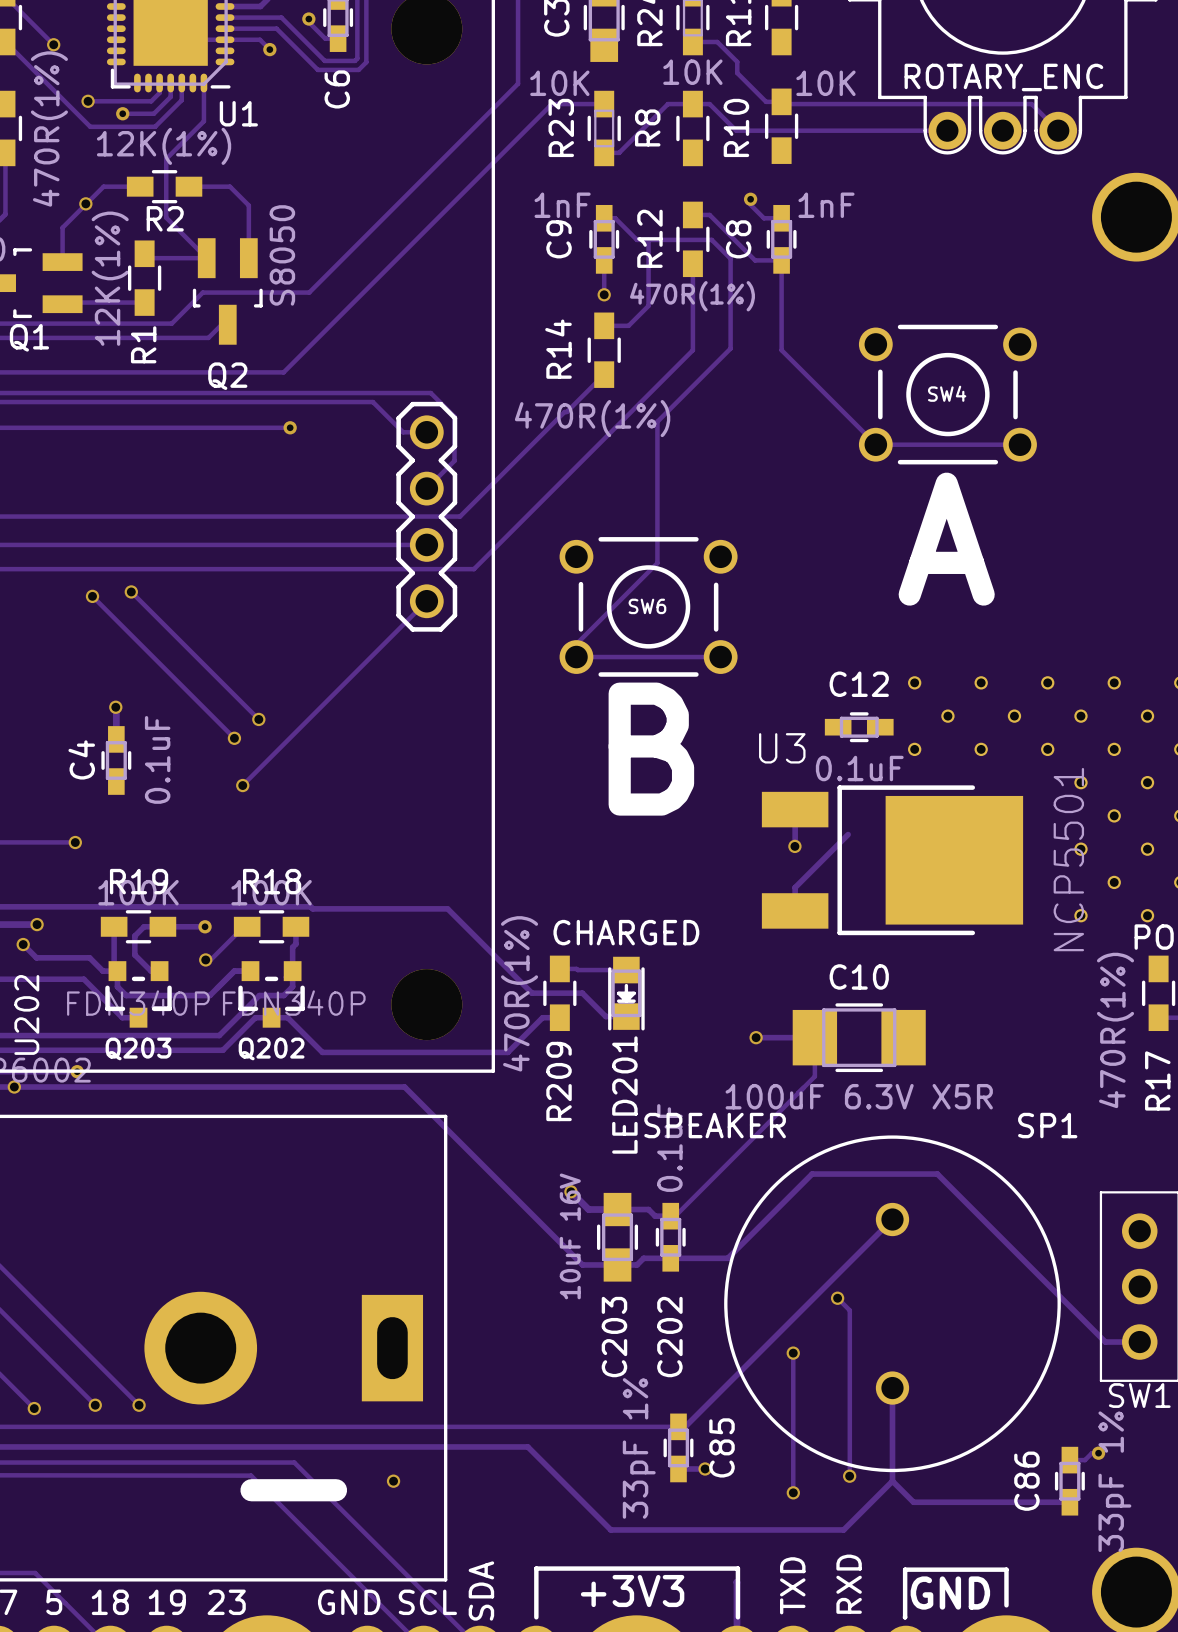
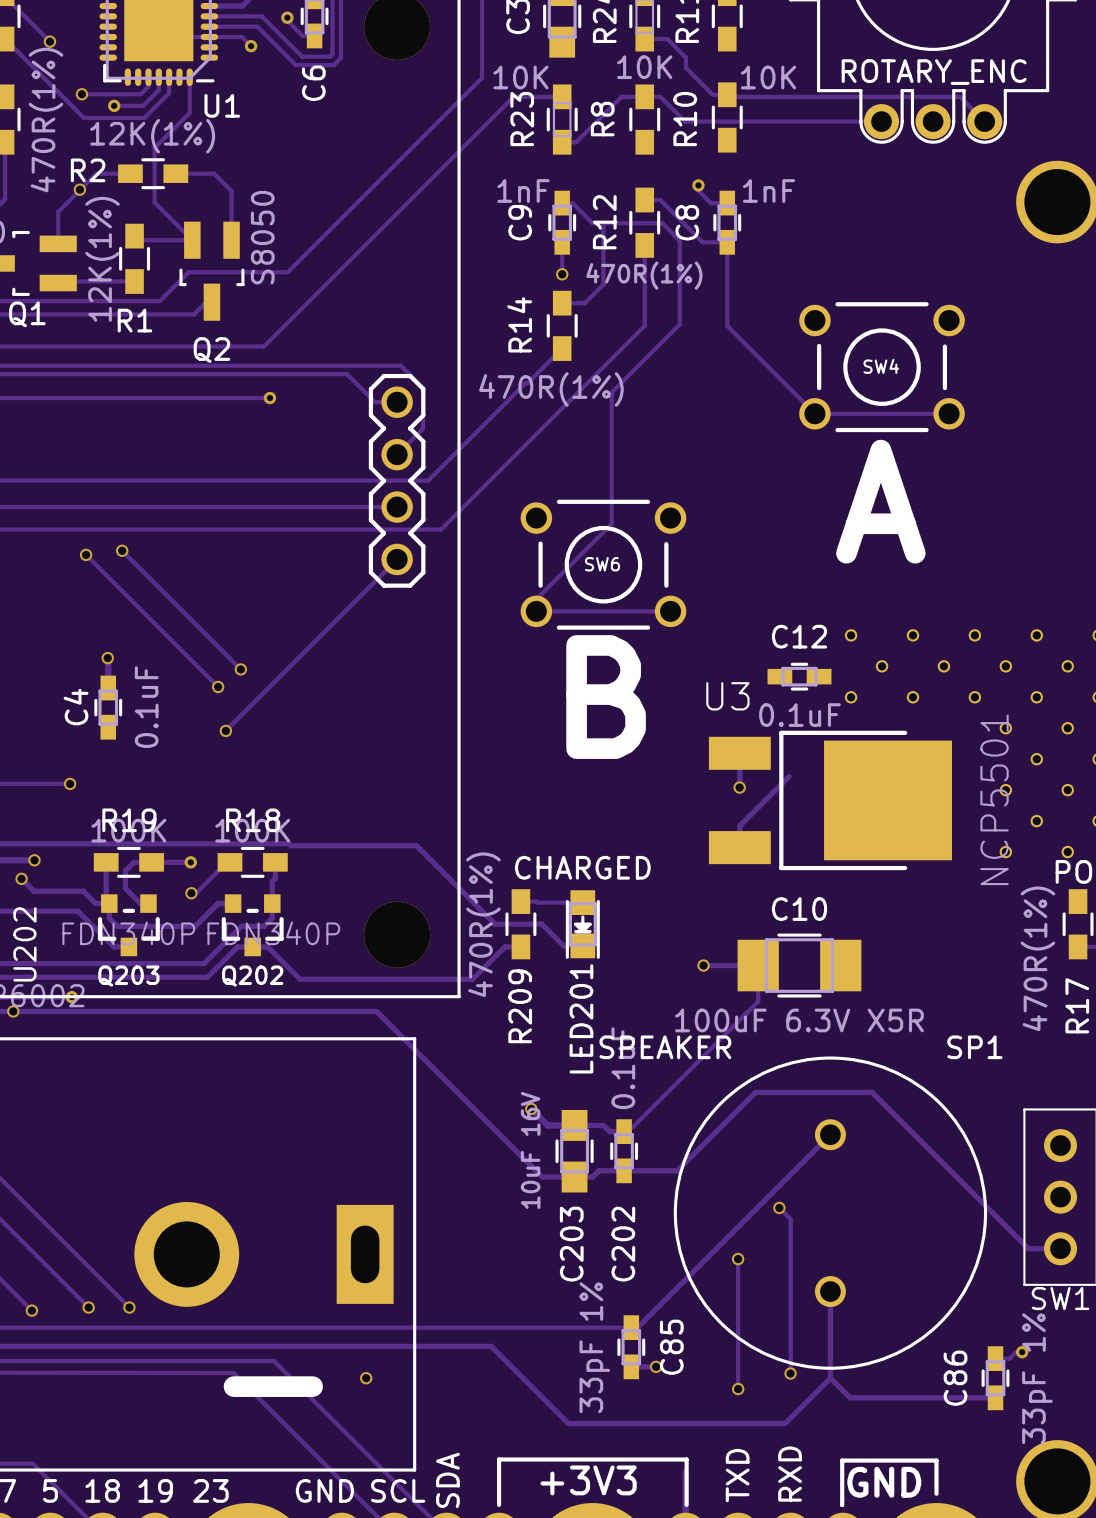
R2 name position: R2 (165, 218) -> R2 (88, 170)
R1 name rotation: 0° (143, 344) -> 90° clockwise (134, 320)

